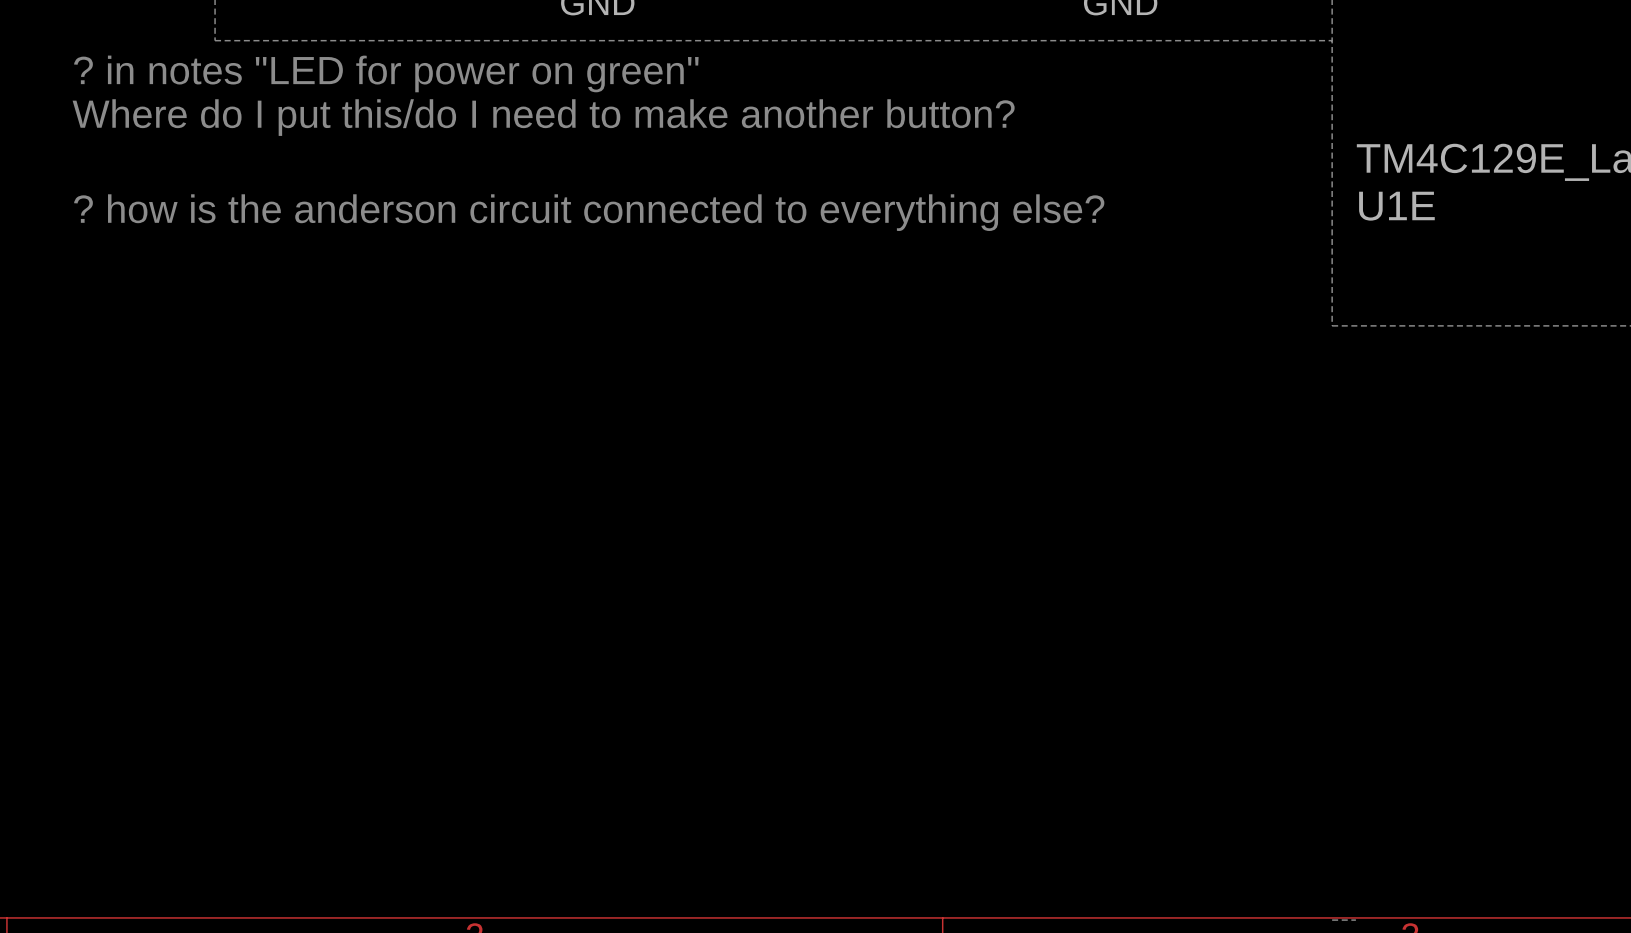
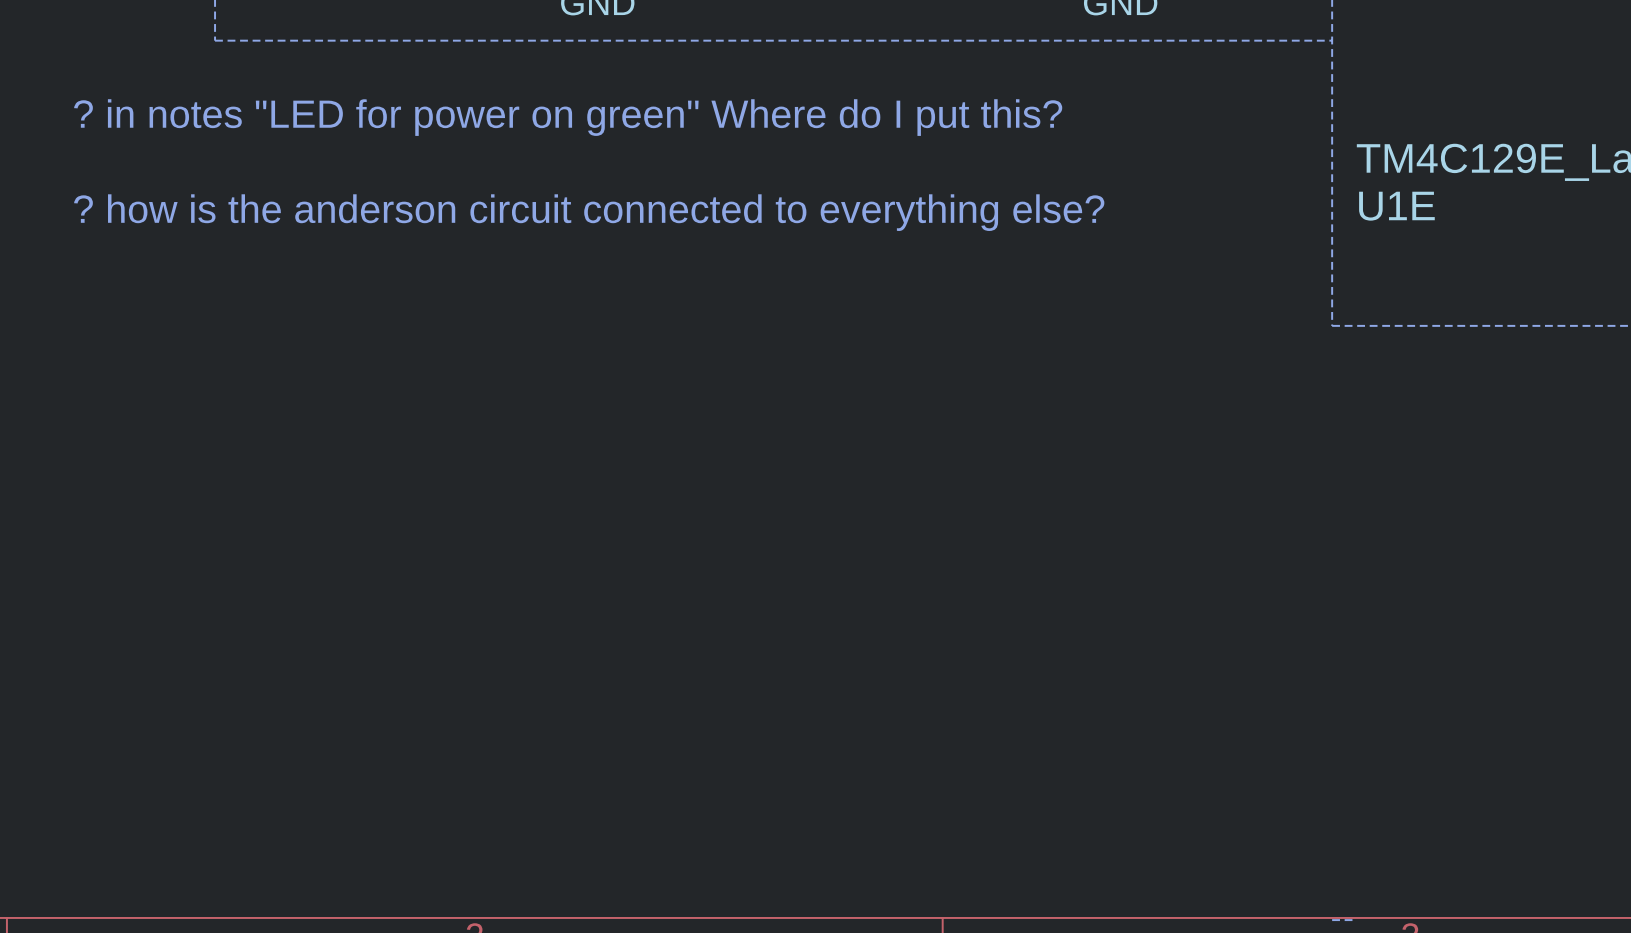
text: ? in notes "LED for power on green" (386, 73) -> none
text: Where do I put this/do I need to make another button? (543, 117) -> ? in notes "LED for power on green" Where do I put this? (568, 117)

